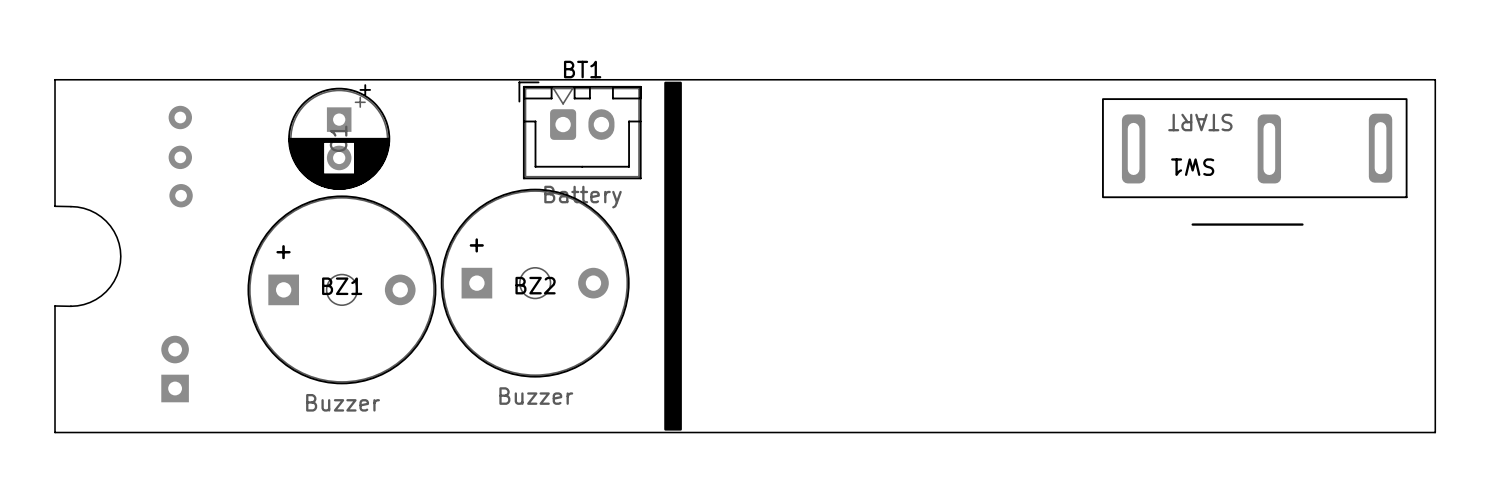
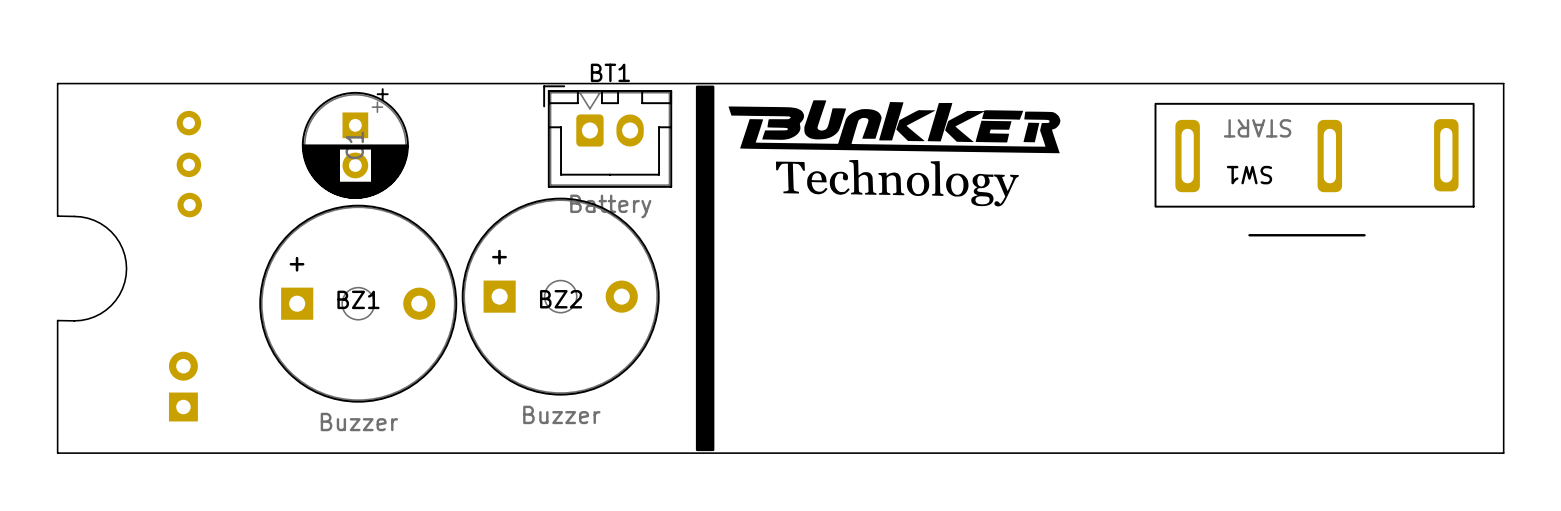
drawing: none -> [728, 100, 1061, 207]

